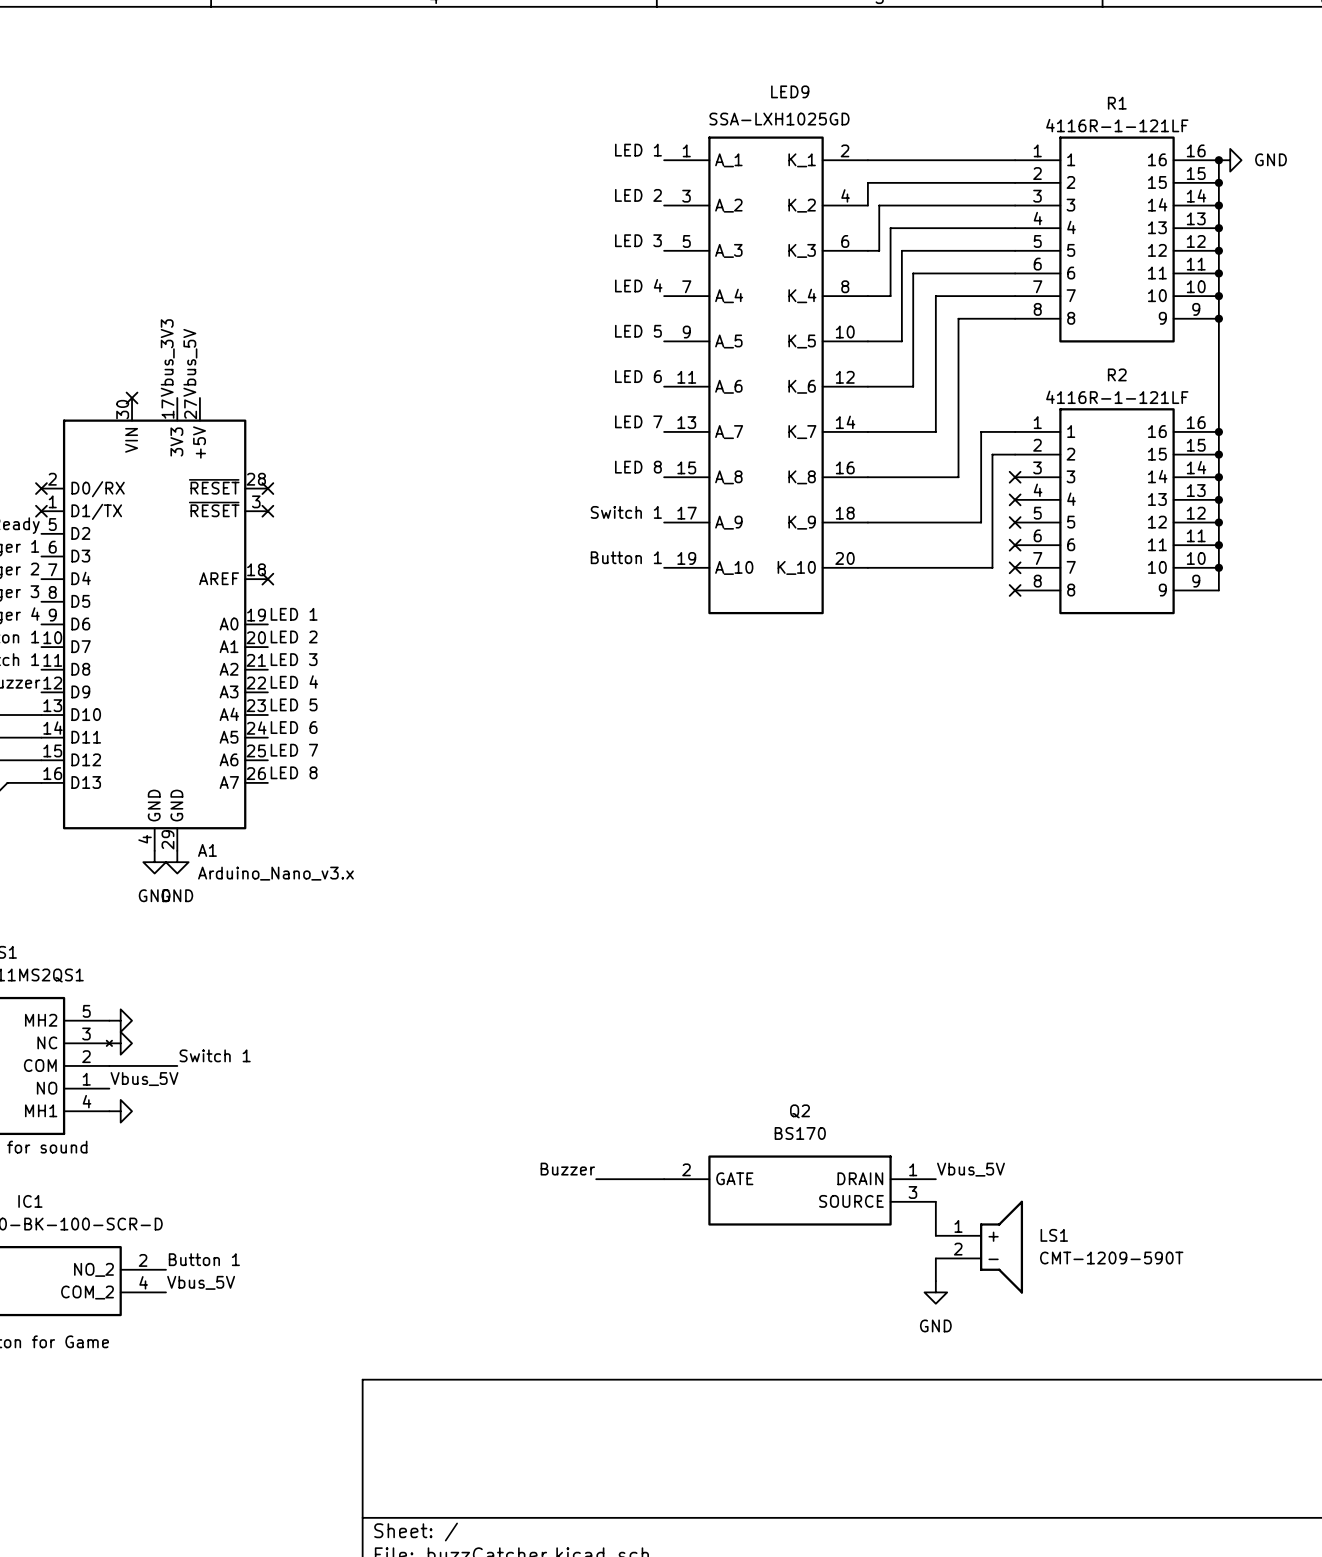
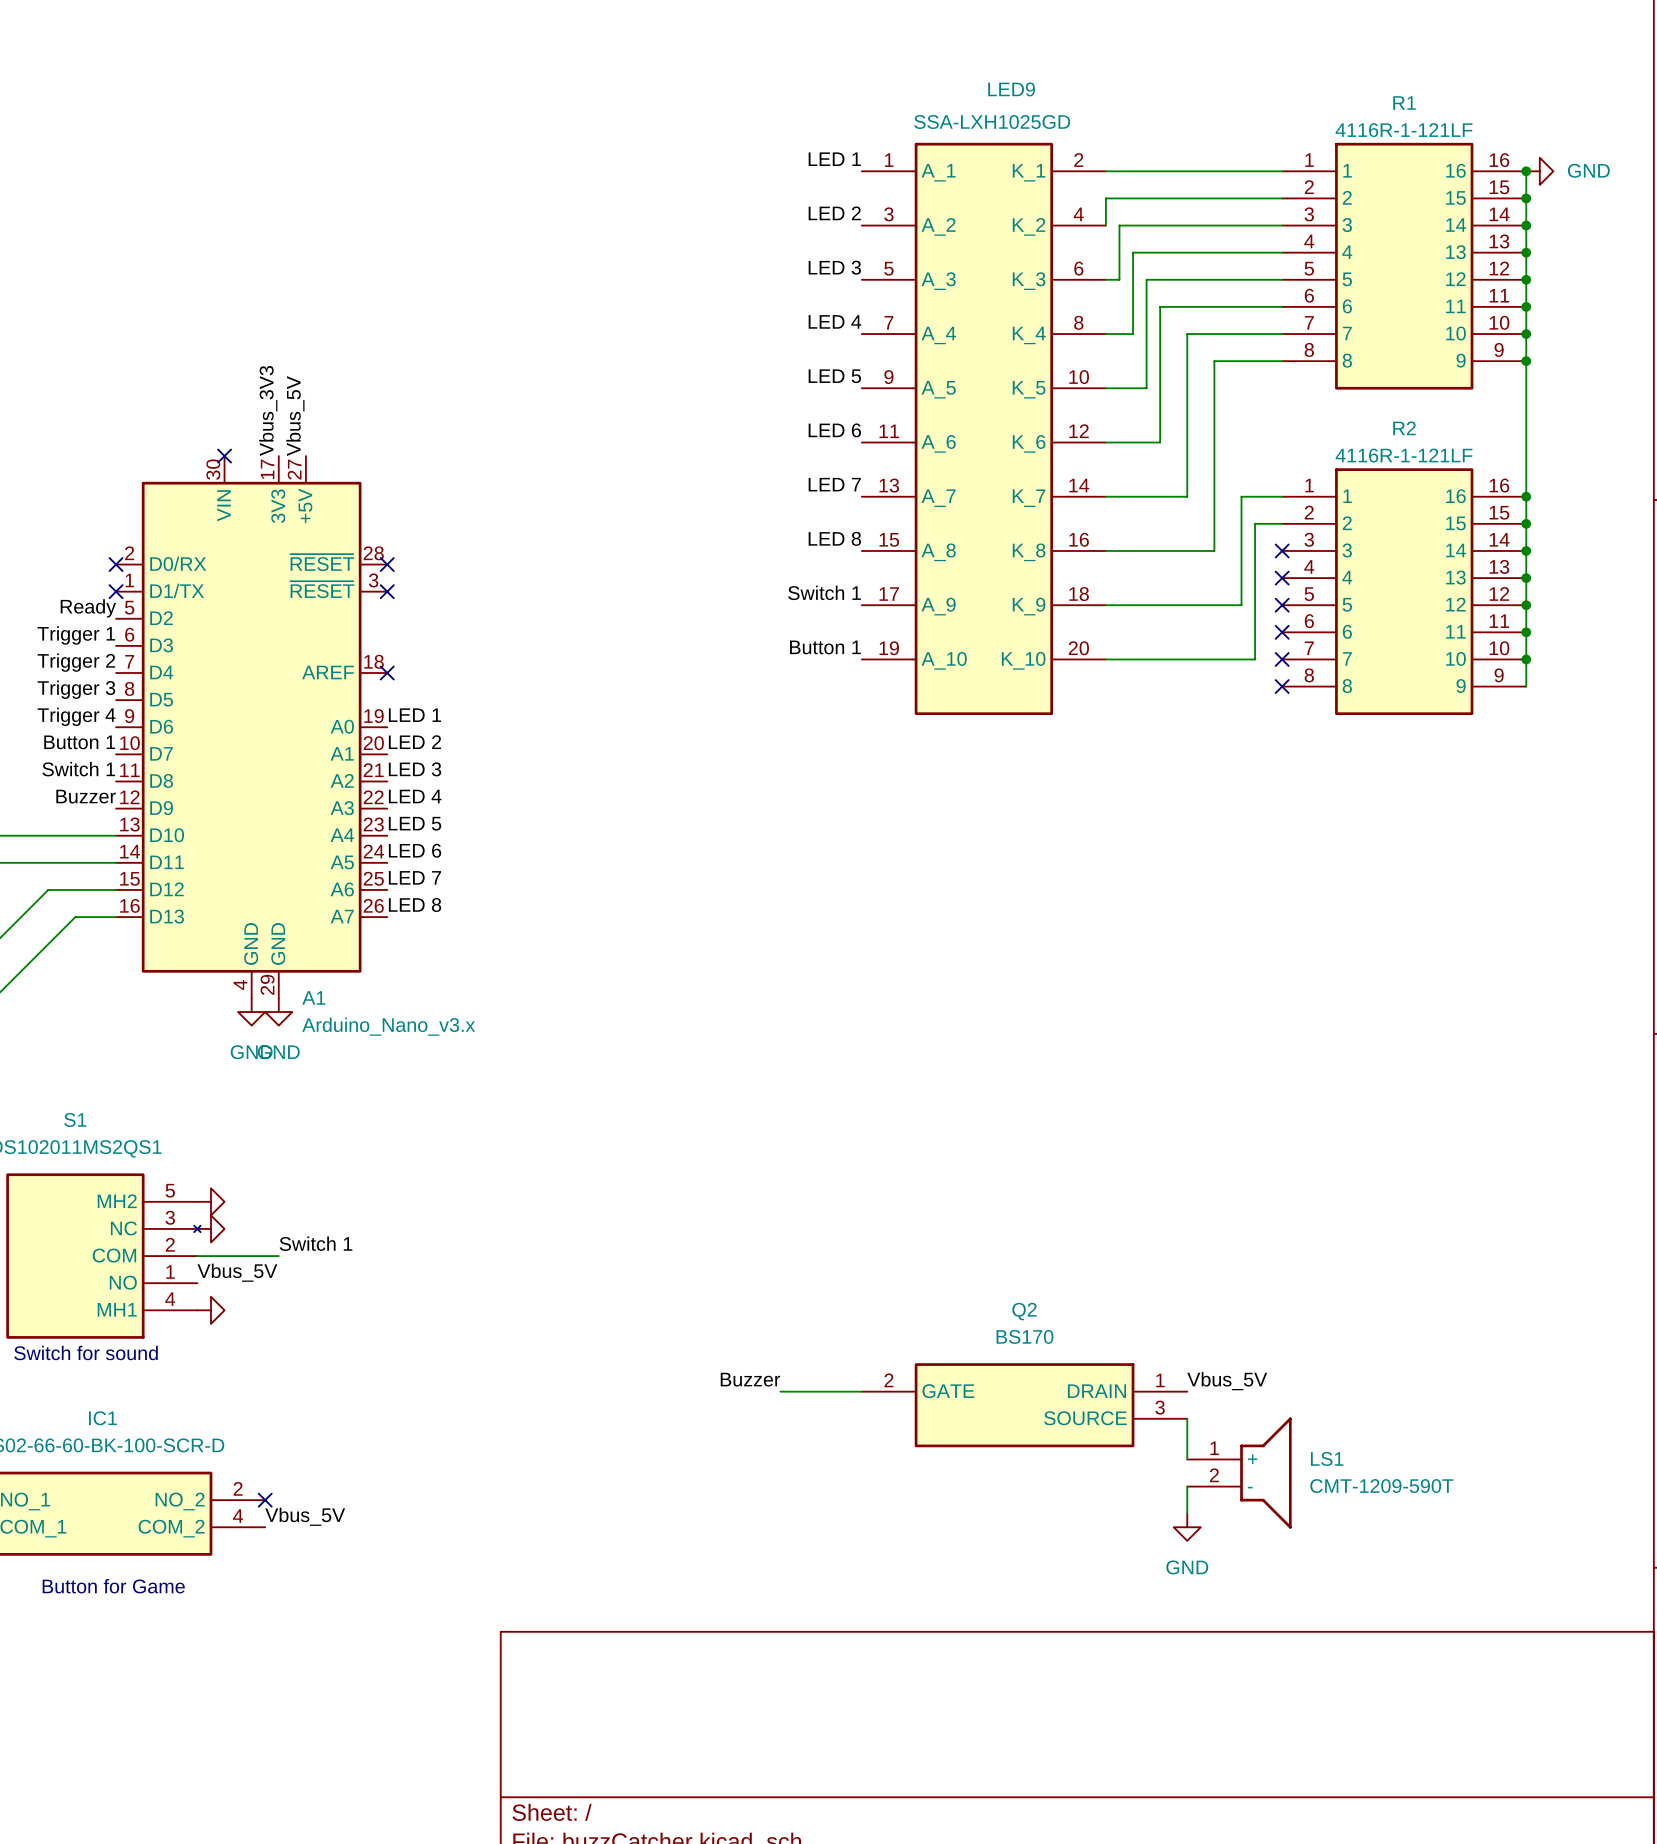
label: Button 1 (204, 1259) -> none
no-connect mark: none -> (265, 1500)

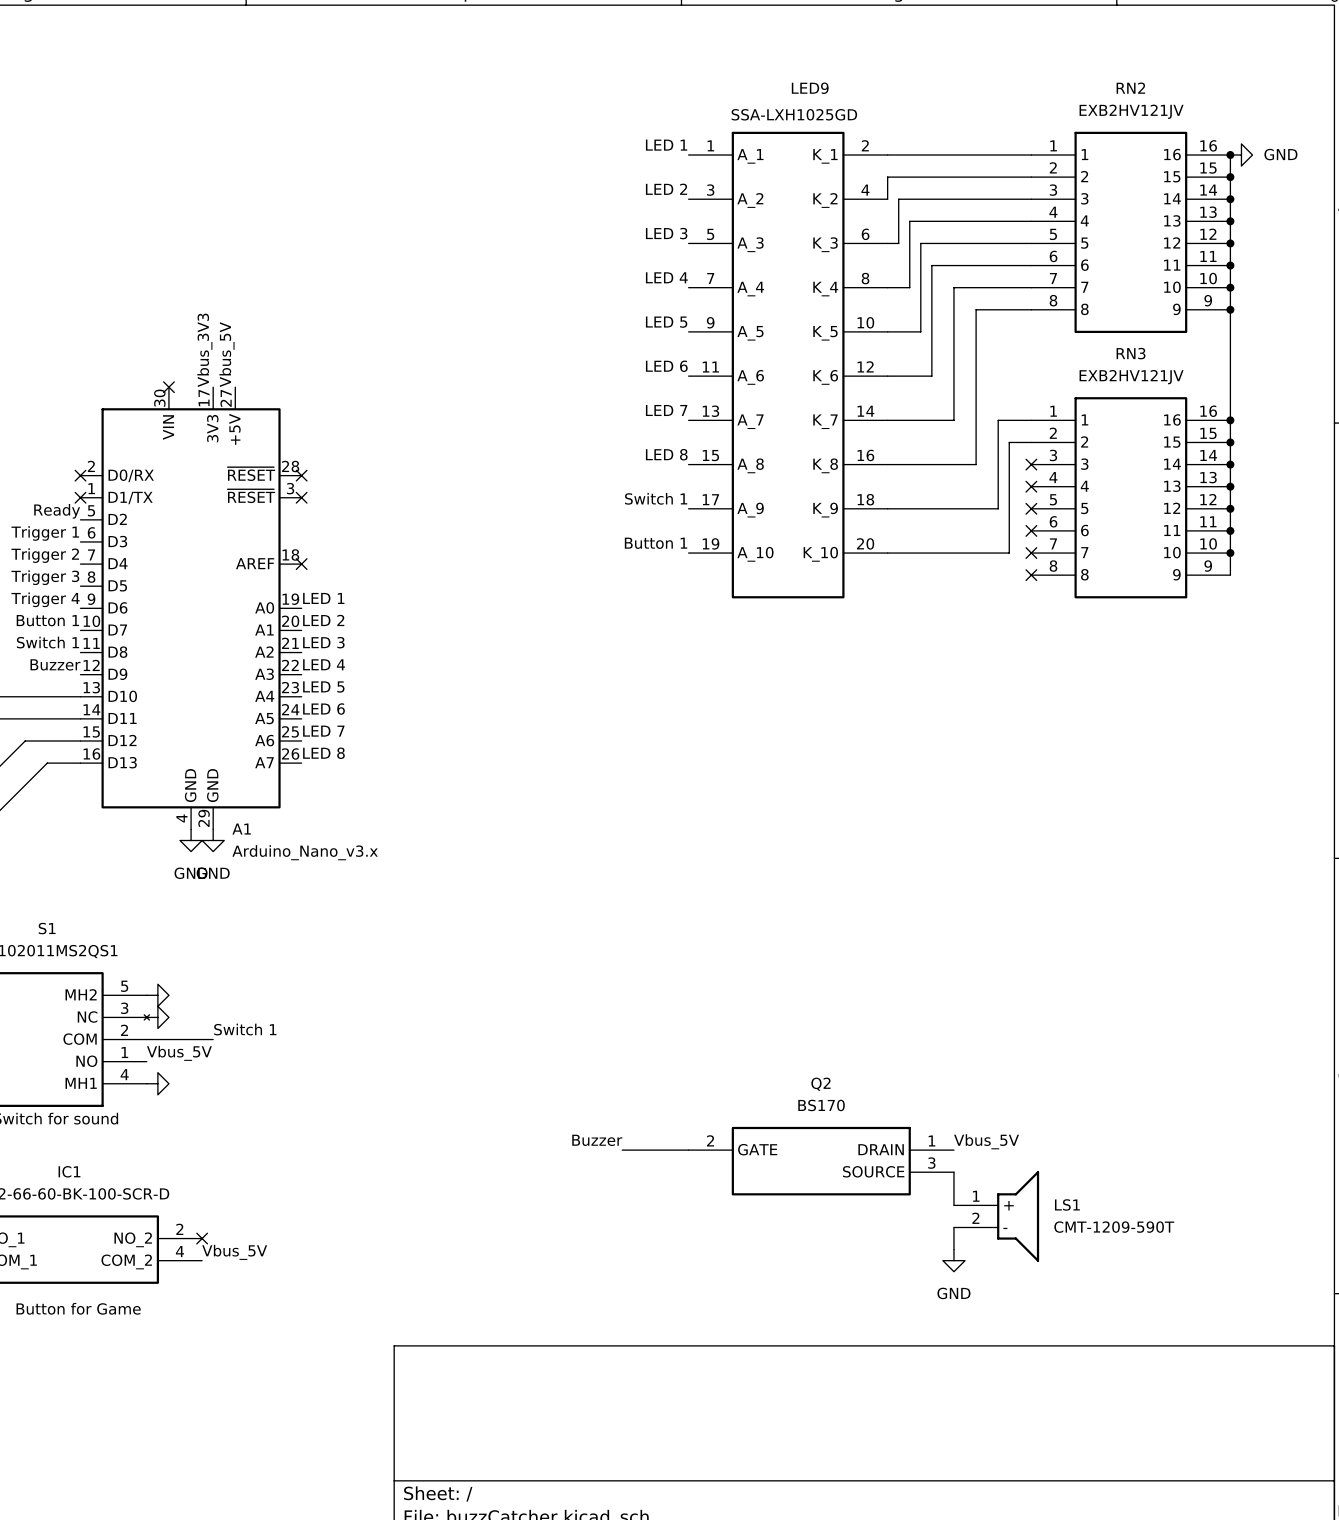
R1 name: R1 (1404, 103) -> RN2 (1130, 88)
R1 value: 4116R-1-121LF (1404, 130) -> EXB2HV121JV (1131, 111)
R2 name: R2 (1404, 428) -> RN3 (1131, 353)
R2 value: 4116R-1-121LF (1404, 455) -> EXB2HV121JV (1131, 377)

